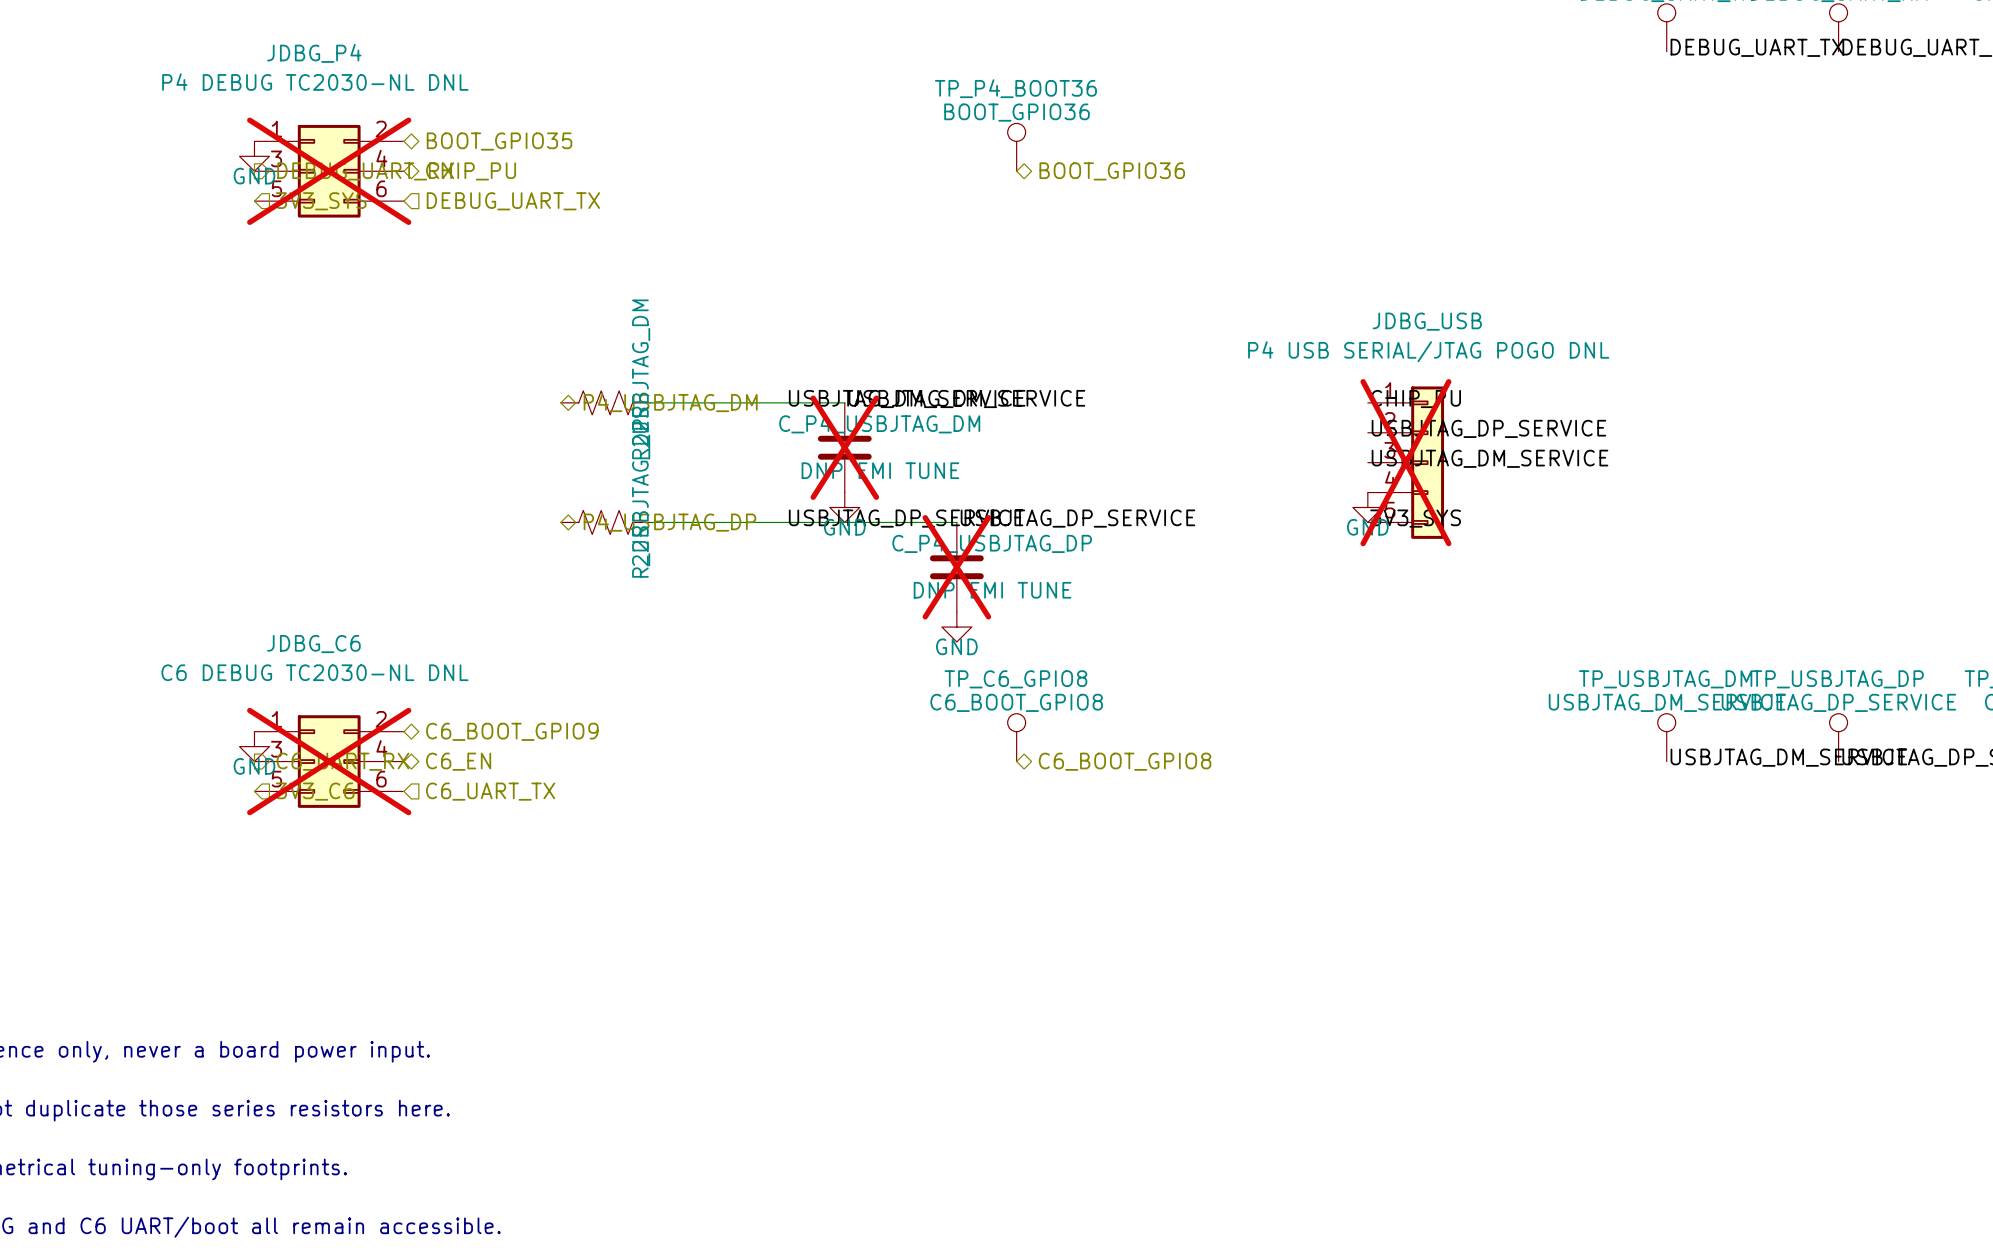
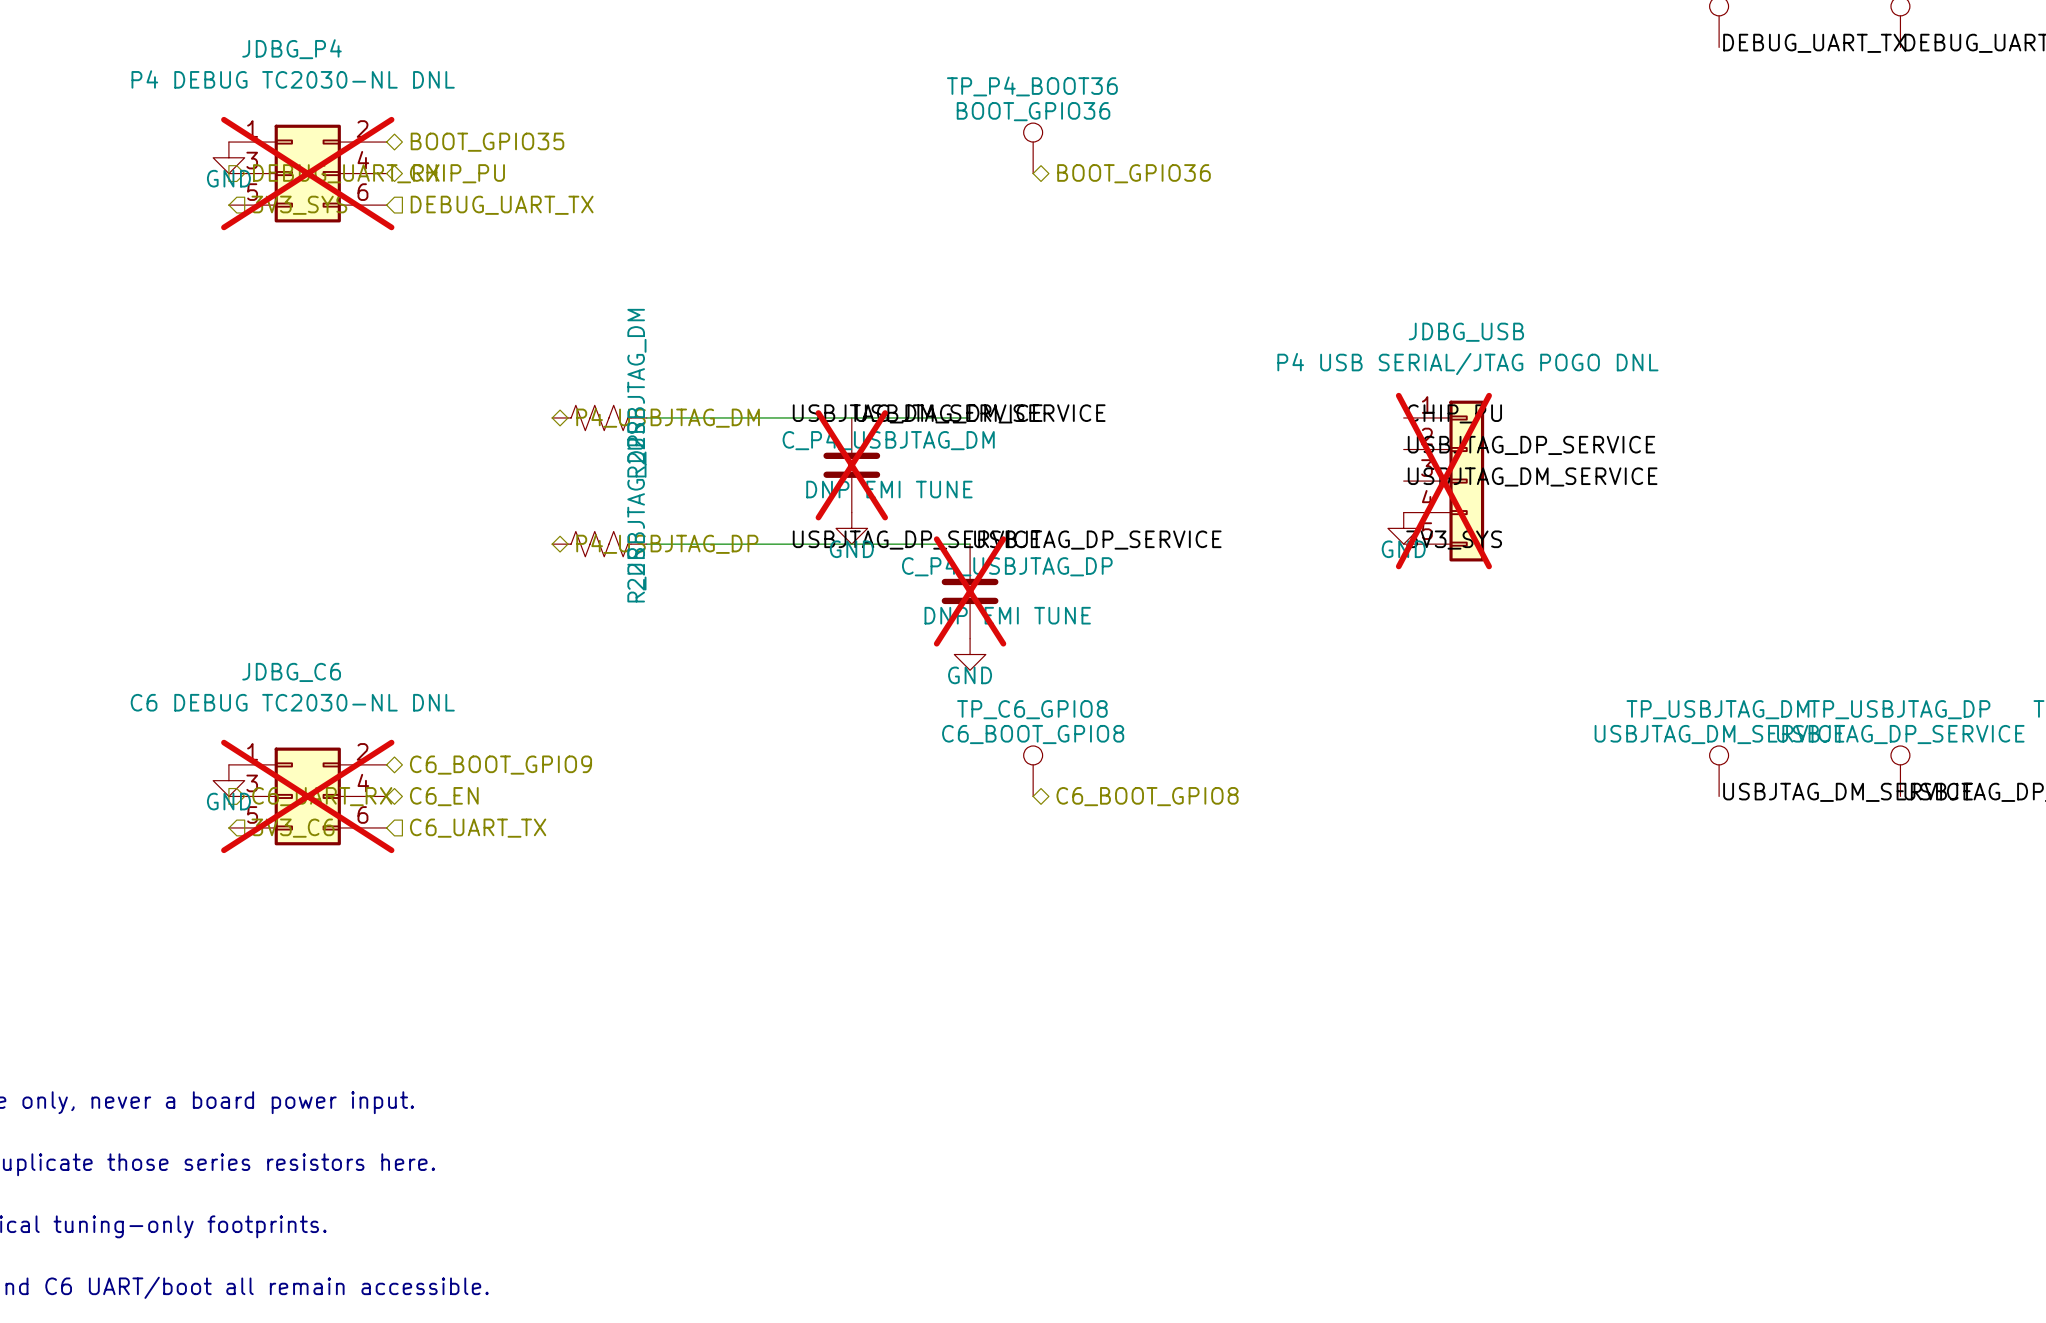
wire: none -> (851, 417) (970, 417)

